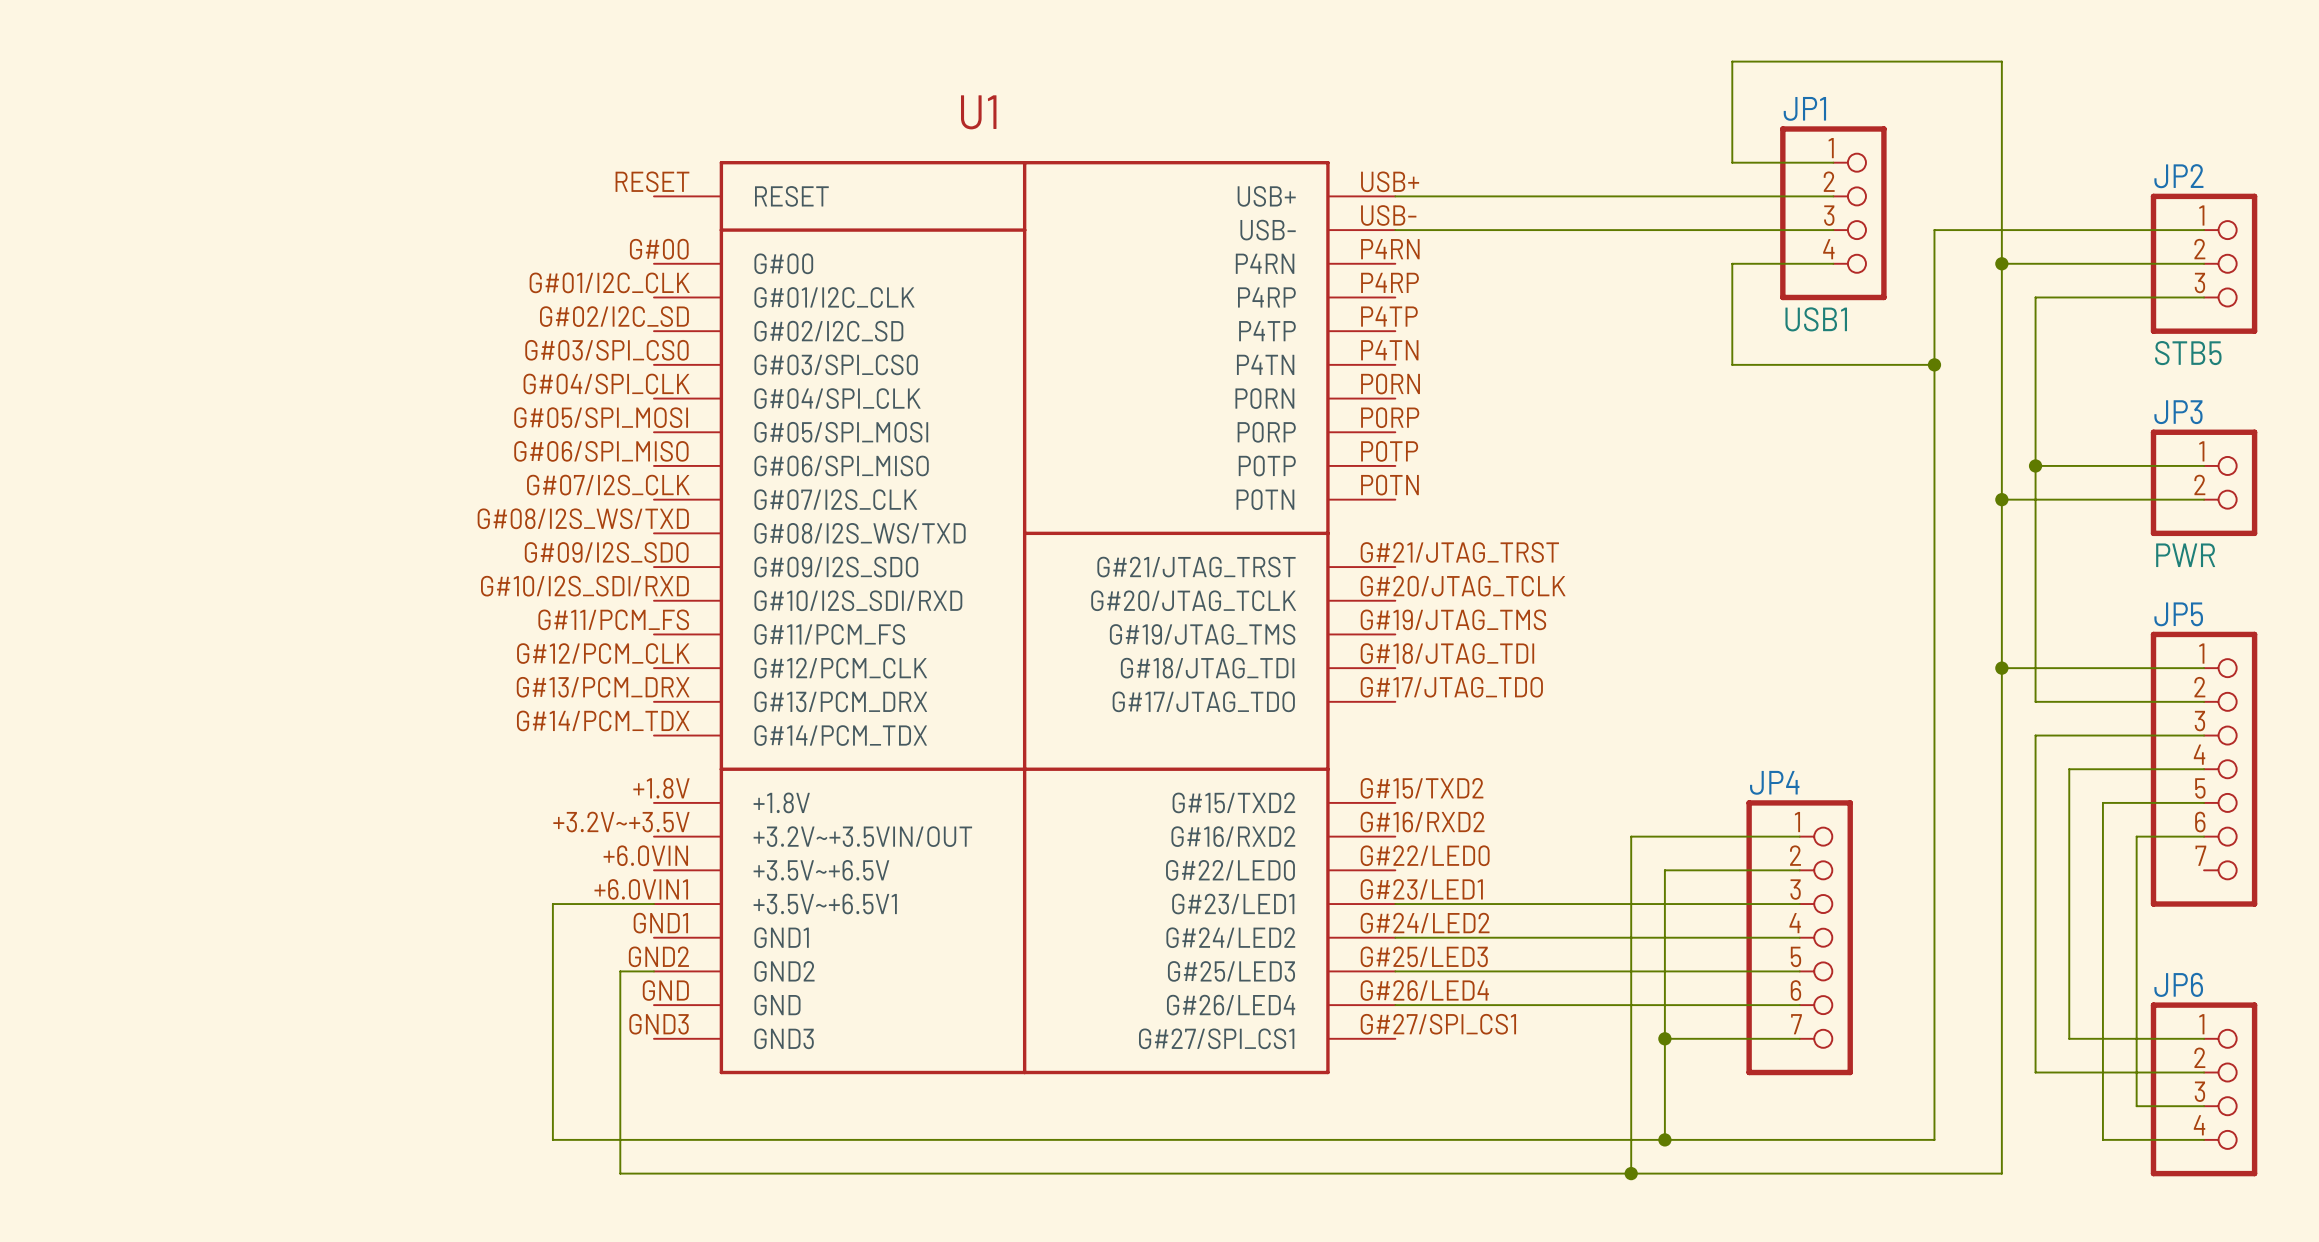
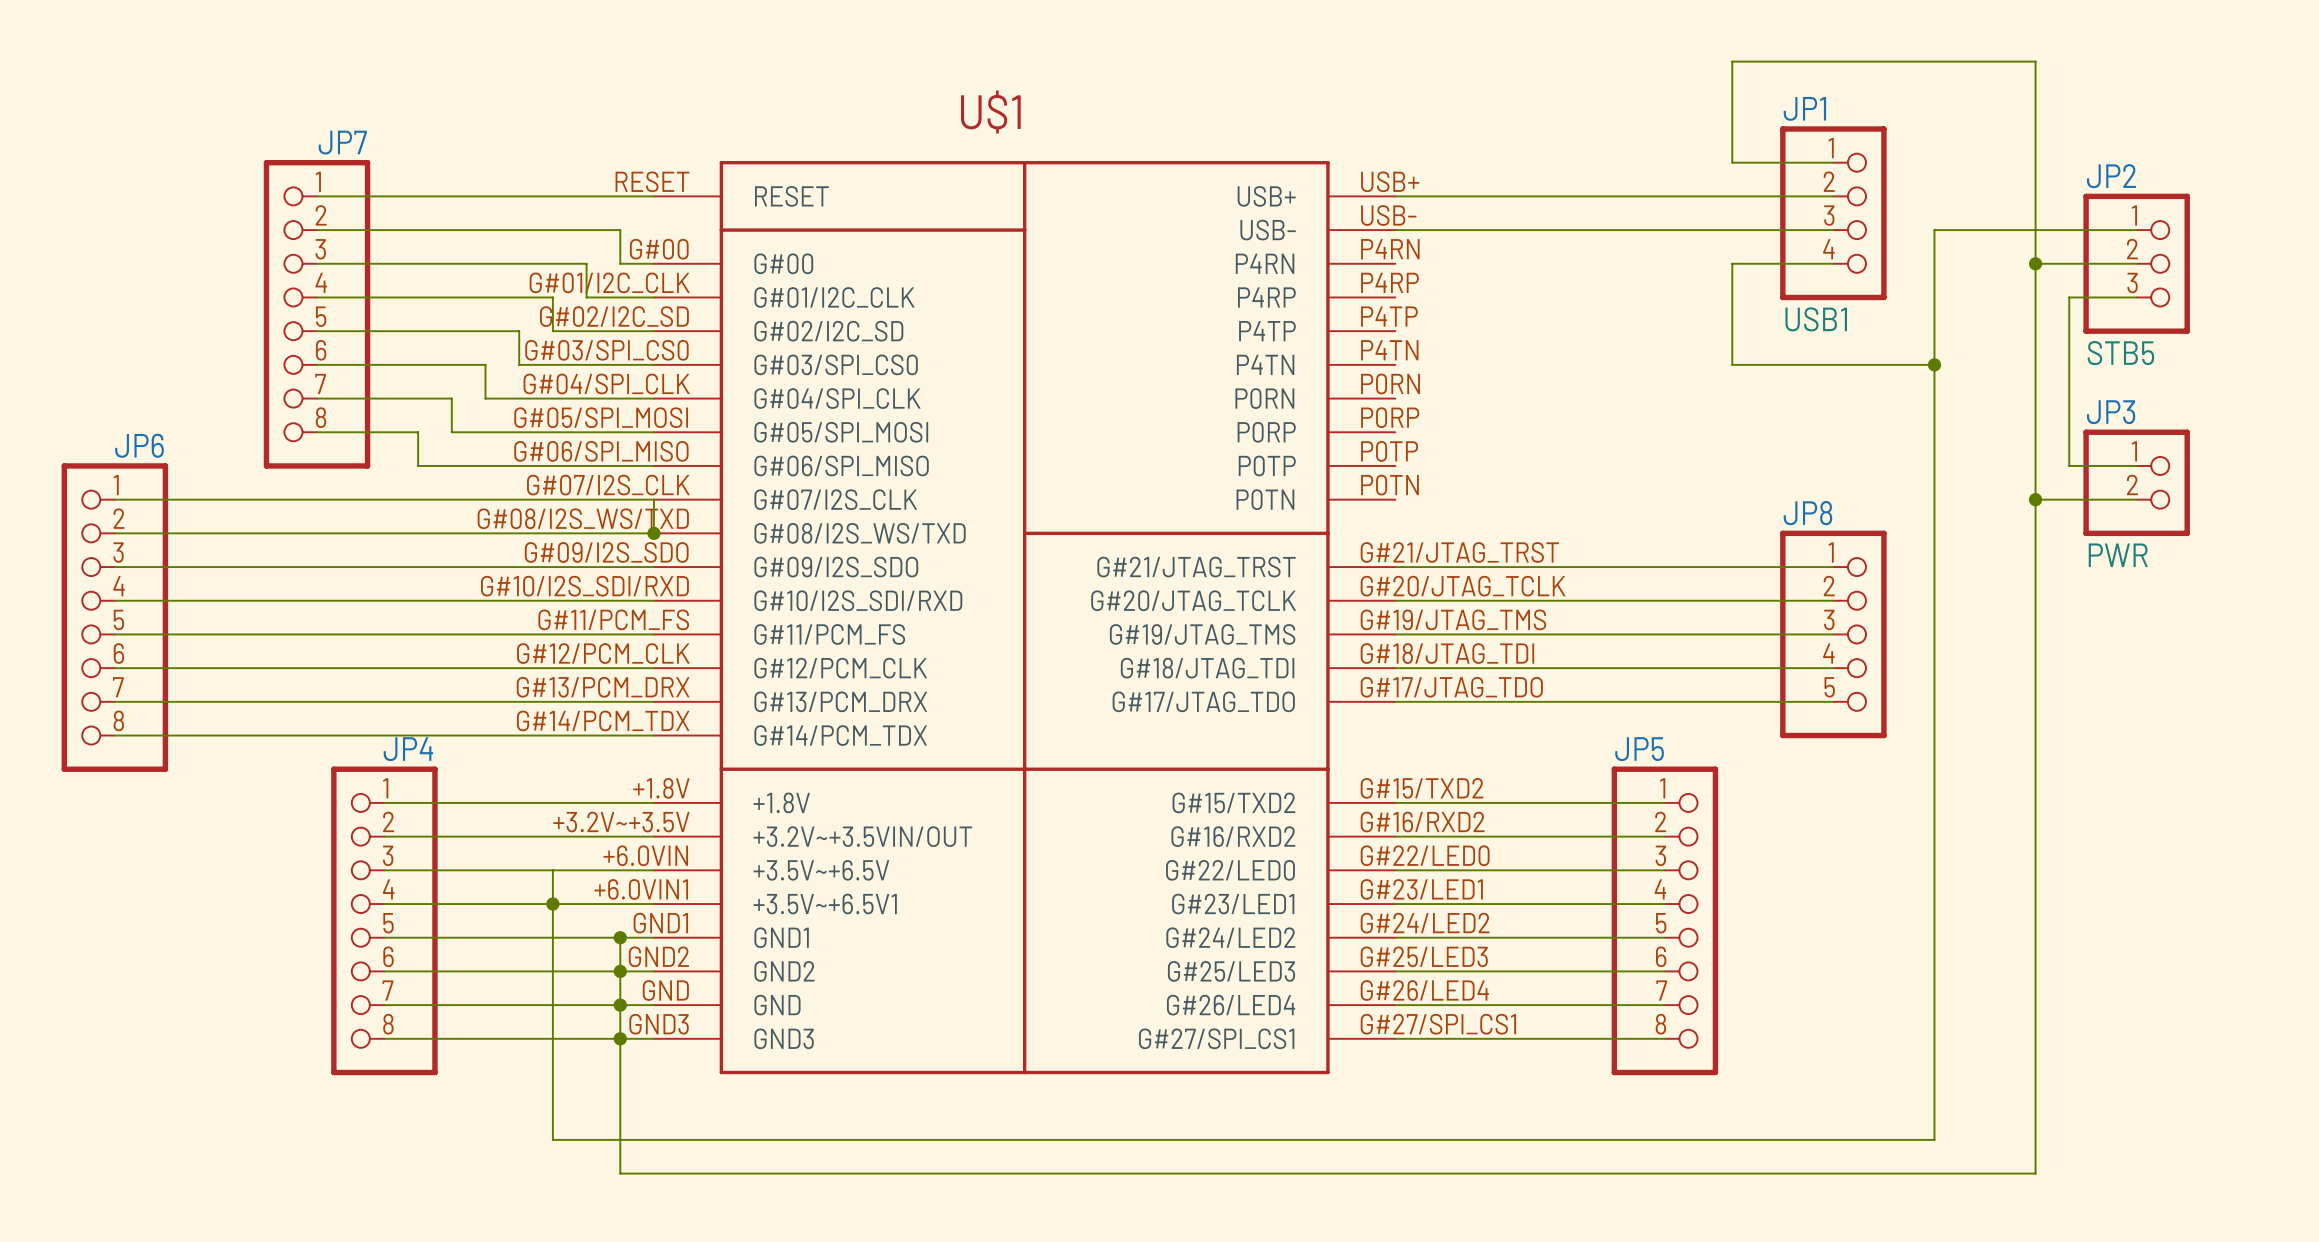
wire: (2001, 61) (2001, 1173) -> (2001, 61) (2035, 61) (2035, 297)
U1 name: U1 (978, 112) -> U$1 (990, 112)
wire: none -> (317, 196) (653, 196)
wire: none -> (317, 230) (620, 230) (620, 263) (653, 263)
wire: (2136, 230) (2204, 230) -> none
wire: none -> (317, 263) (586, 263) (586, 297) (653, 297)
wire: (2001, 263) (2035, 263) -> none
junction position: (2001, 263) -> (2035, 263)
wire: (2136, 263) (2204, 263) -> none
JP2 position: (2204, 263) -> (2136, 263)
wire: none -> (317, 297) (552, 297) (552, 331) (653, 331)
wire: (2035, 297) (2069, 297) -> (2069, 465) (2069, 297)
wire: (2136, 297) (2204, 297) -> none
JP7: none -> (317, 314)
wire: none -> (317, 331) (519, 331) (519, 364) (653, 364)
wire: none -> (317, 364) (485, 364) (485, 398) (653, 398)
wire: none -> (317, 398) (451, 398) (451, 432) (653, 432)
wire: none -> (317, 432) (418, 432) (418, 465) (653, 465)
wire: (2035, 465) (2069, 465) -> none
junction: (2035, 465) -> none
wire: (2136, 465) (2204, 465) -> none
JP3 position: (2204, 482) -> (2136, 482)
wire: none -> (114, 499) (653, 499) (653, 533) (114, 533)
wire: (2001, 499) (2035, 499) -> none
junction: (2001, 499) -> none
junction: none -> (2035, 499)
wire: (2136, 499) (2204, 499) -> none
junction: none -> (653, 533)
wire: none -> (114, 567) (653, 567)
wire: none -> (1395, 567) (1833, 567)
wire: none -> (114, 600) (653, 600)
wire: none -> (1395, 600) (1833, 600)
JP5 symbol: [2150, 631, 2258, 907] -> [1611, 766, 1719, 1076]
wire: none -> (114, 634) (653, 634)
wire: none -> (1395, 634) (1833, 634)
JP8: none -> (1833, 634)
wire: none -> (114, 668) (653, 668)
wire: none -> (1395, 668) (1833, 668)
wire: (2001, 668) (2204, 668) -> none
junction: (2001, 668) -> none
wire: none -> (114, 701) (653, 701)
wire: none -> (1395, 701) (1833, 701)
wire: (2035, 701) (2204, 701) -> (2035, 701) (2035, 735)
wire: none -> (114, 735) (653, 735)
wire: (2035, 735) (2204, 735) -> none
wire: (2204, 769) (2069, 769) (2069, 1038) (2204, 1038) -> none
JP4 name position: JP4 (1774, 782) -> JP4 (408, 749)
JP4 symbol: [1746, 800, 1853, 1076] -> [331, 766, 438, 1076]
wire: none -> (384, 802) (653, 802)
wire: none -> (1395, 802) (1664, 802)
wire: (2204, 802) (2102, 802) (2102, 1139) (2204, 1139) -> none
wire: none -> (384, 836) (653, 836)
wire: (1631, 836) (1631, 1173) -> (1631, 836) (1395, 836)
wire: (1664, 836) (1799, 836) -> none
wire: (2204, 836) (2136, 836) (2136, 1106) (2204, 1106) -> none
wire: none -> (384, 870) (653, 870)
wire: none -> (552, 870) (552, 904) (384, 904)
wire: none -> (1395, 870) (1664, 870)
wire: (1799, 870) (1664, 870) (1664, 1139) -> none
junction: none -> (552, 904)
wire: (1664, 904) (1799, 904) -> none
wire: none -> (384, 937) (653, 937)
wire: none -> (620, 937) (620, 971) (384, 971)
junction: none -> (620, 937)
wire: (1664, 937) (1799, 937) -> none
junction: none -> (620, 971)
wire: (1664, 971) (1799, 971) -> none
JP6 name position: JP6 (2178, 984) -> JP6 (139, 445)
JP6 symbol: [2150, 1002, 2258, 1177] -> [61, 463, 169, 772]
wire: none -> (384, 1005) (653, 1005)
junction: none -> (620, 1005)
wire: (1664, 1005) (1799, 1005) -> none
wire: none -> (384, 1038) (653, 1038)
junction: none -> (620, 1038)
wire: (1664, 1038) (1799, 1038) -> (1664, 1038) (1395, 1038)
junction: (1664, 1038) -> none
wire: (2035, 1072) (2204, 1072) -> (2035, 1072) (2035, 1173) (2001, 1173)
junction: (1664, 1139) -> none
junction: (1631, 1173) -> none

